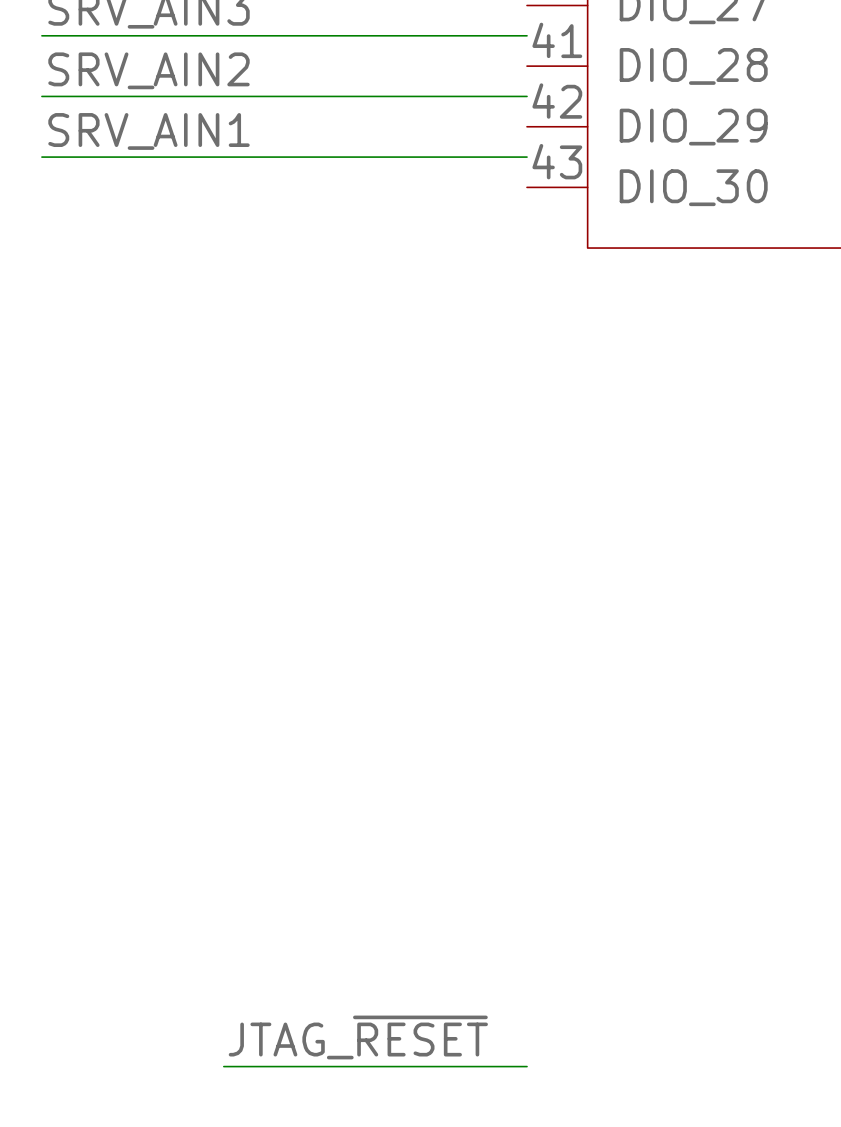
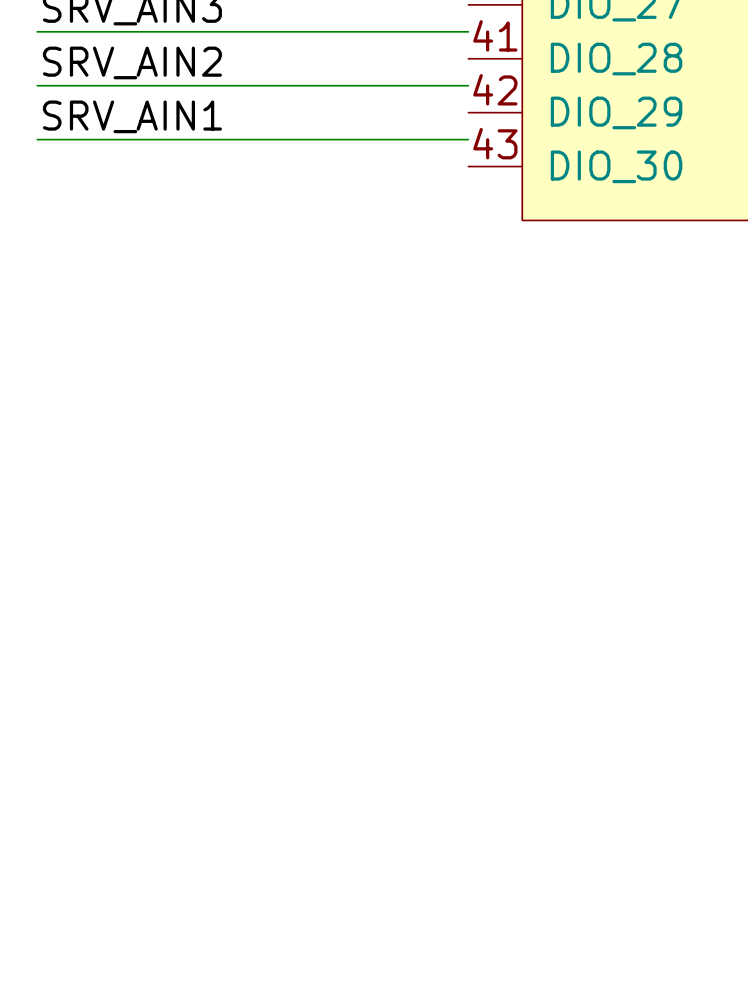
label: JTAG_~{RESET} (358, 1037) -> none
wire: (223, 1066) (527, 1066) -> none

